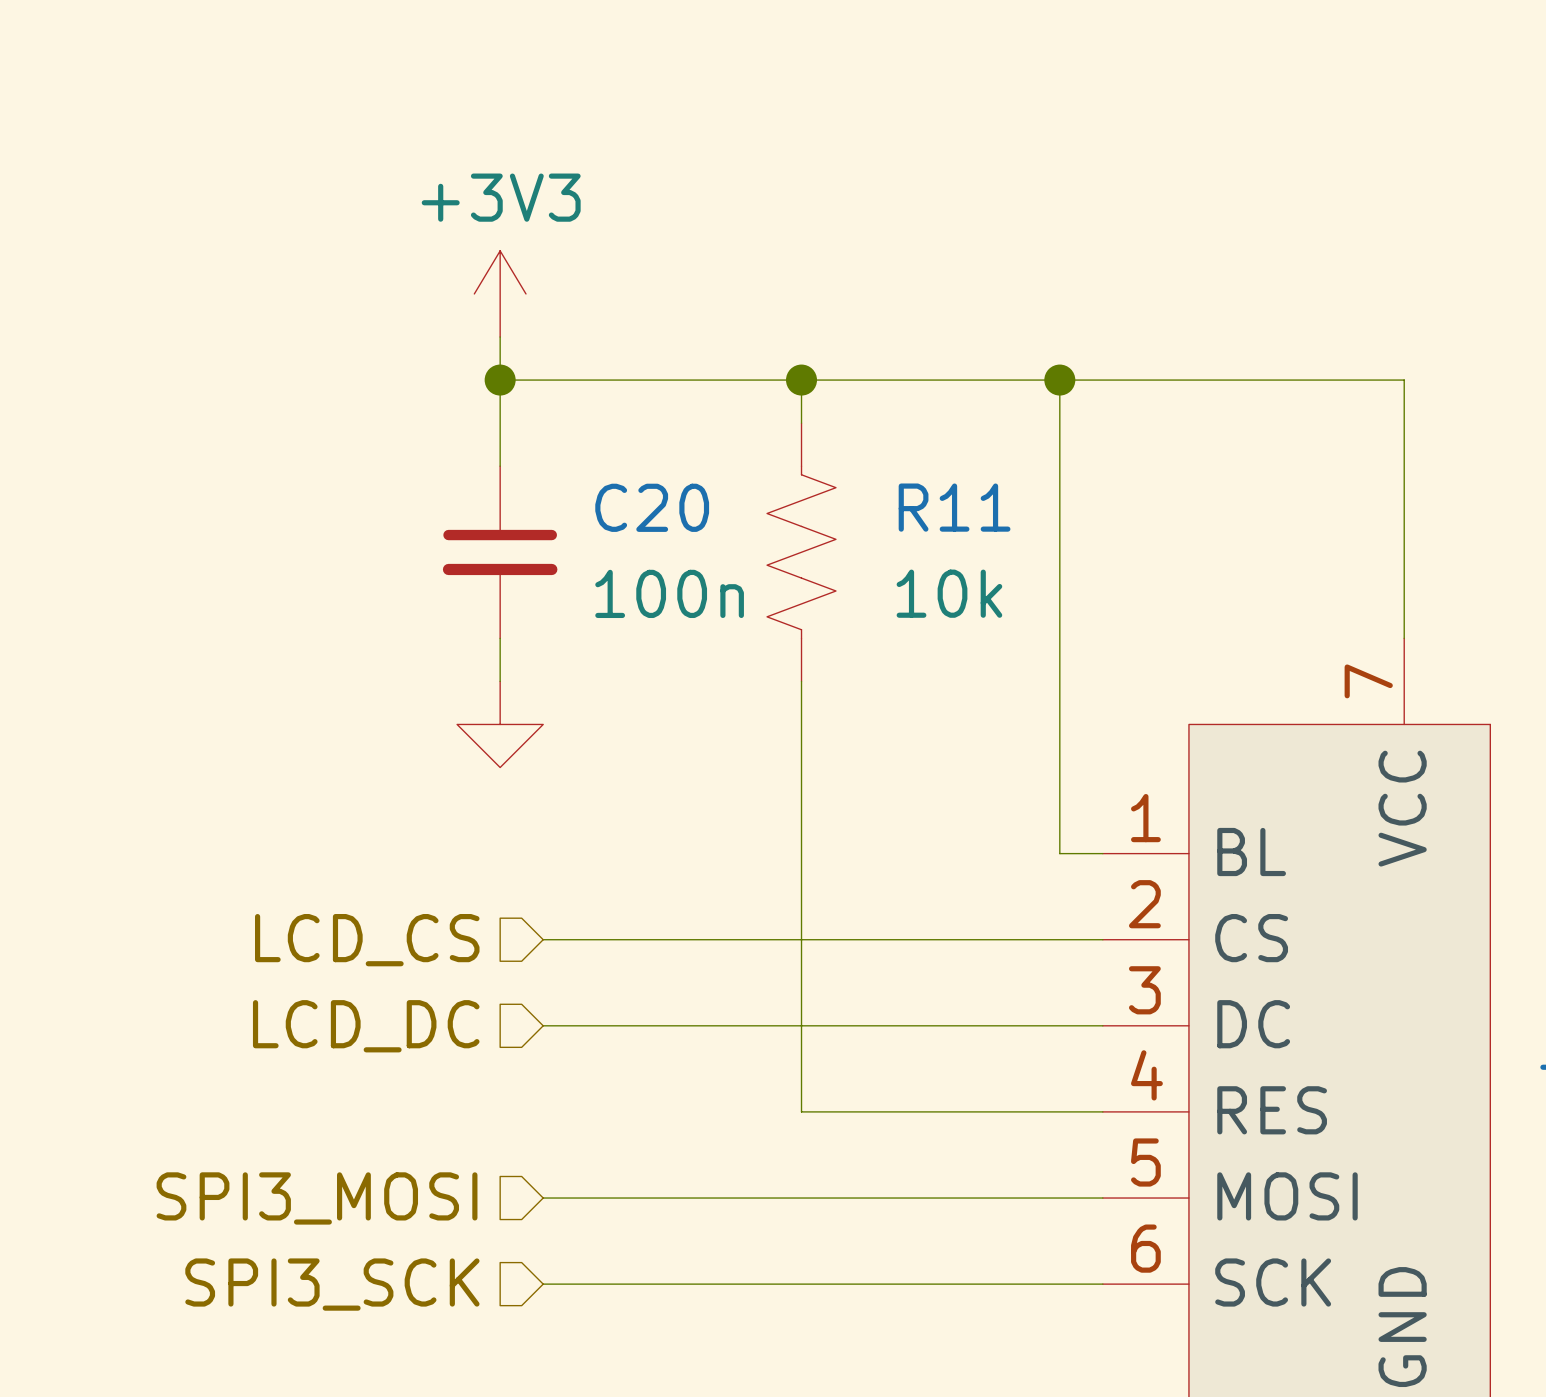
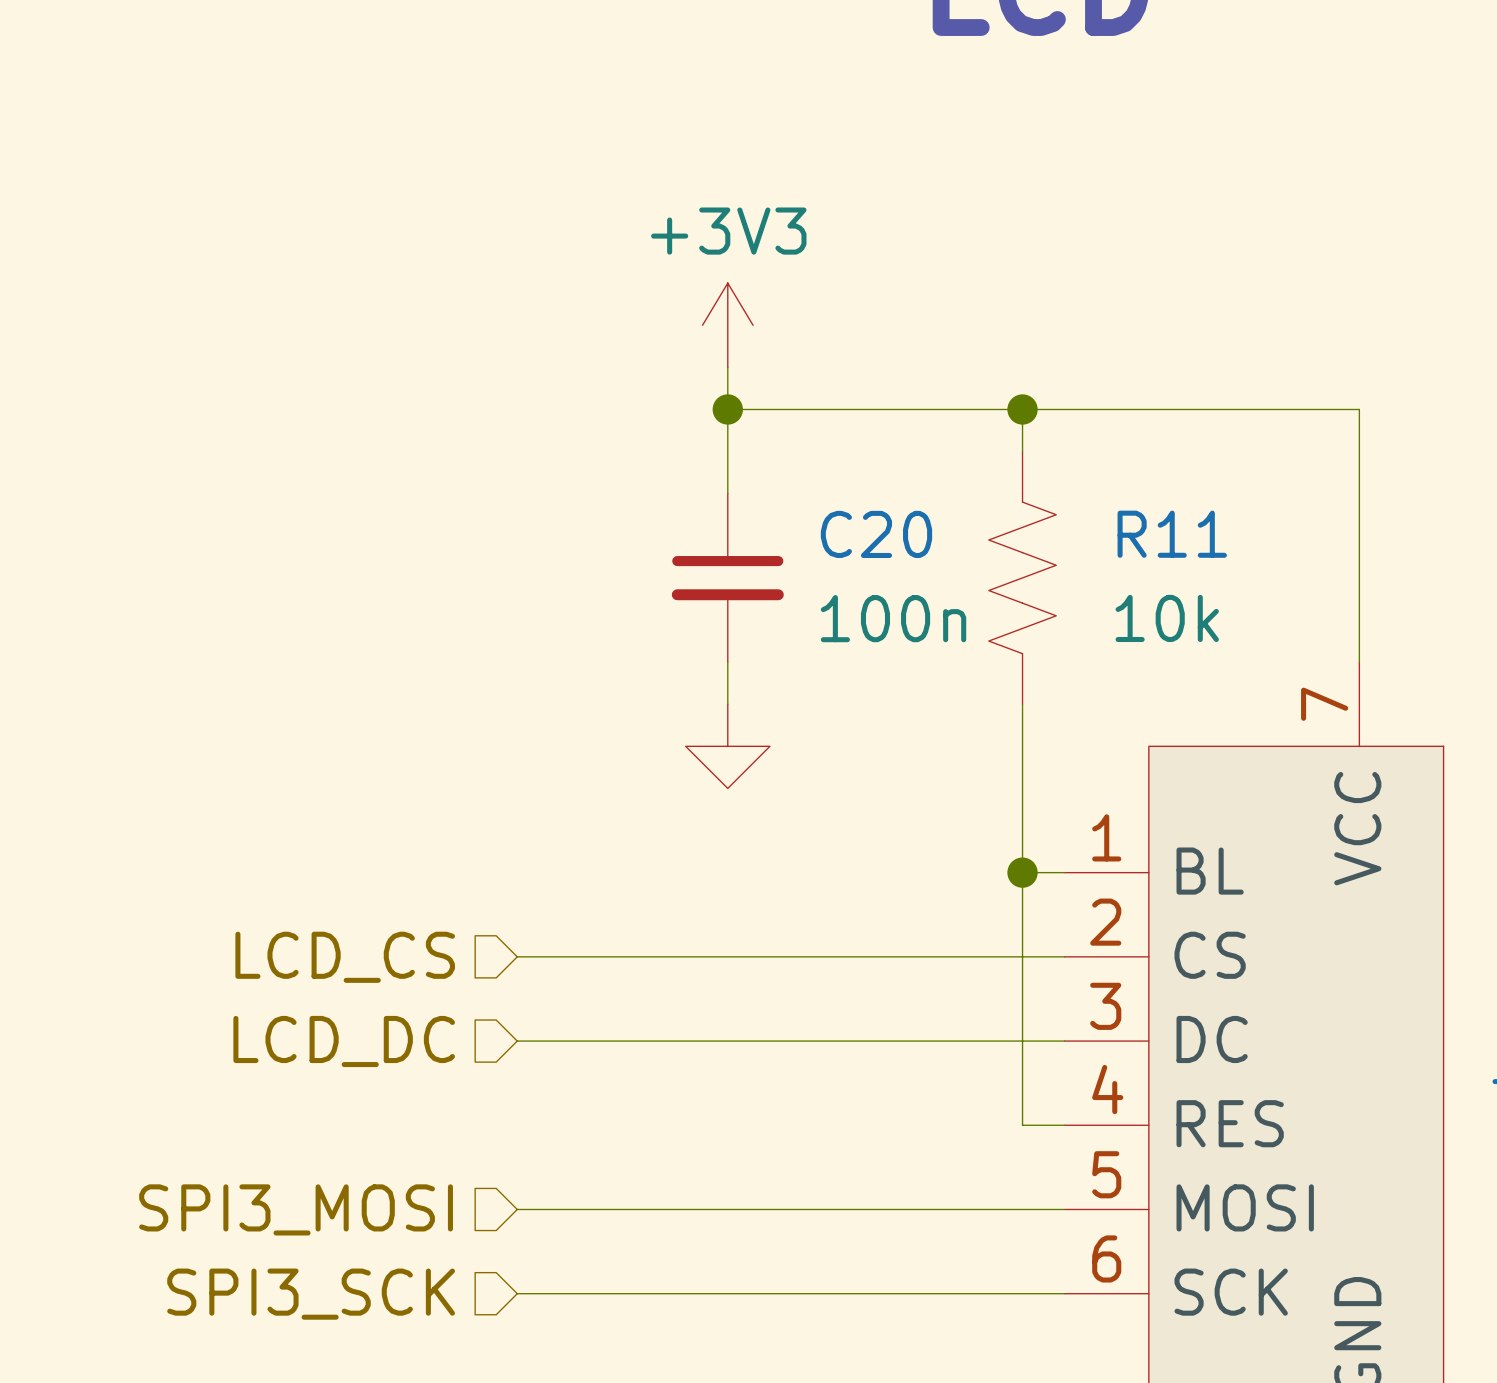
power symbol position: +3V3 (500, 293) -> +3V3 (727, 325)
wire: (500, 337) (500, 466) -> (727, 367) (727, 493)
wire: (500, 380) (758, 380) -> none
junction: (500, 380) -> none
wire: (801, 380) (801, 423) -> none
junction position: (801, 380) -> (727, 409)
wire: (1059, 423) (1059, 681) -> none
C20 position: (500, 552) -> (727, 577)
R11 position: (801, 552) -> (1022, 577)
wire: (500, 638) (500, 681) -> (727, 662) (727, 704)
wire: (801, 681) (801, 1111) (1059, 1111) -> (1022, 872) (1022, 1125)
power symbol position: (500, 724) -> (727, 746)
junction: none -> (1022, 872)

